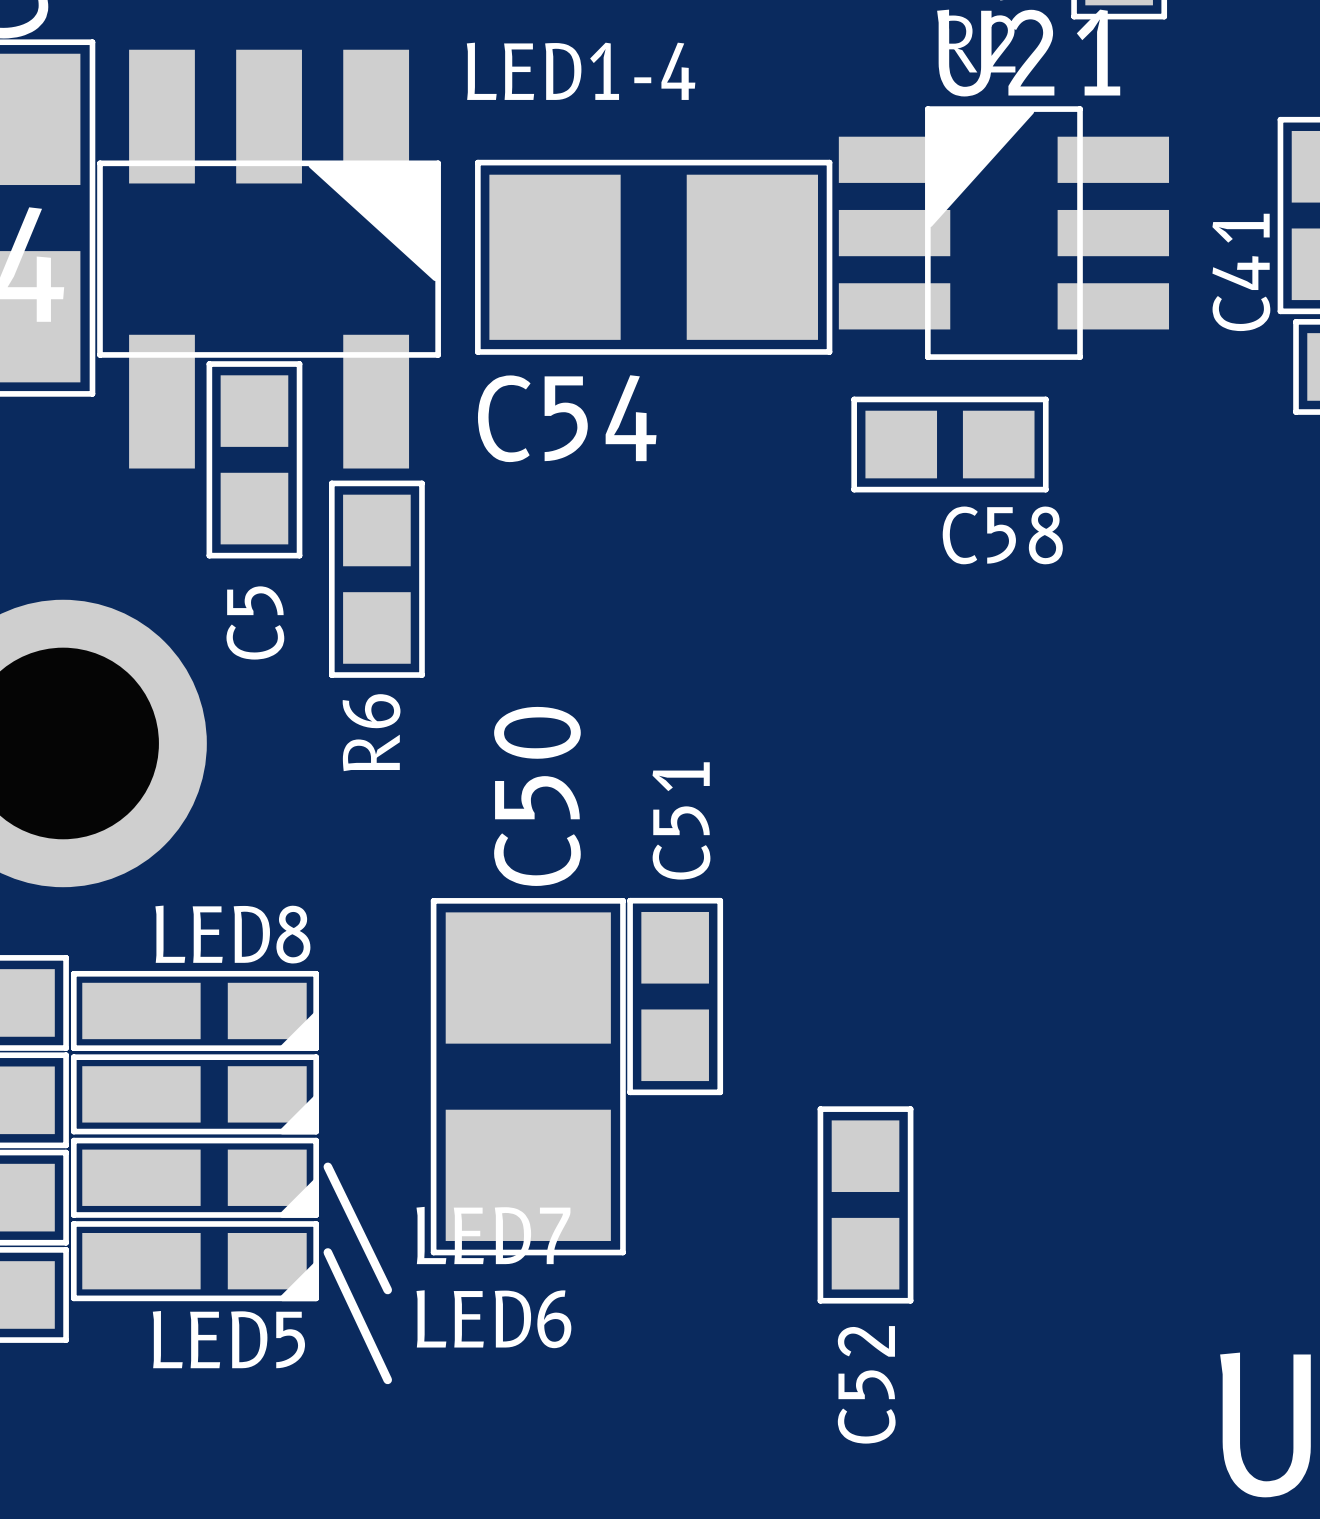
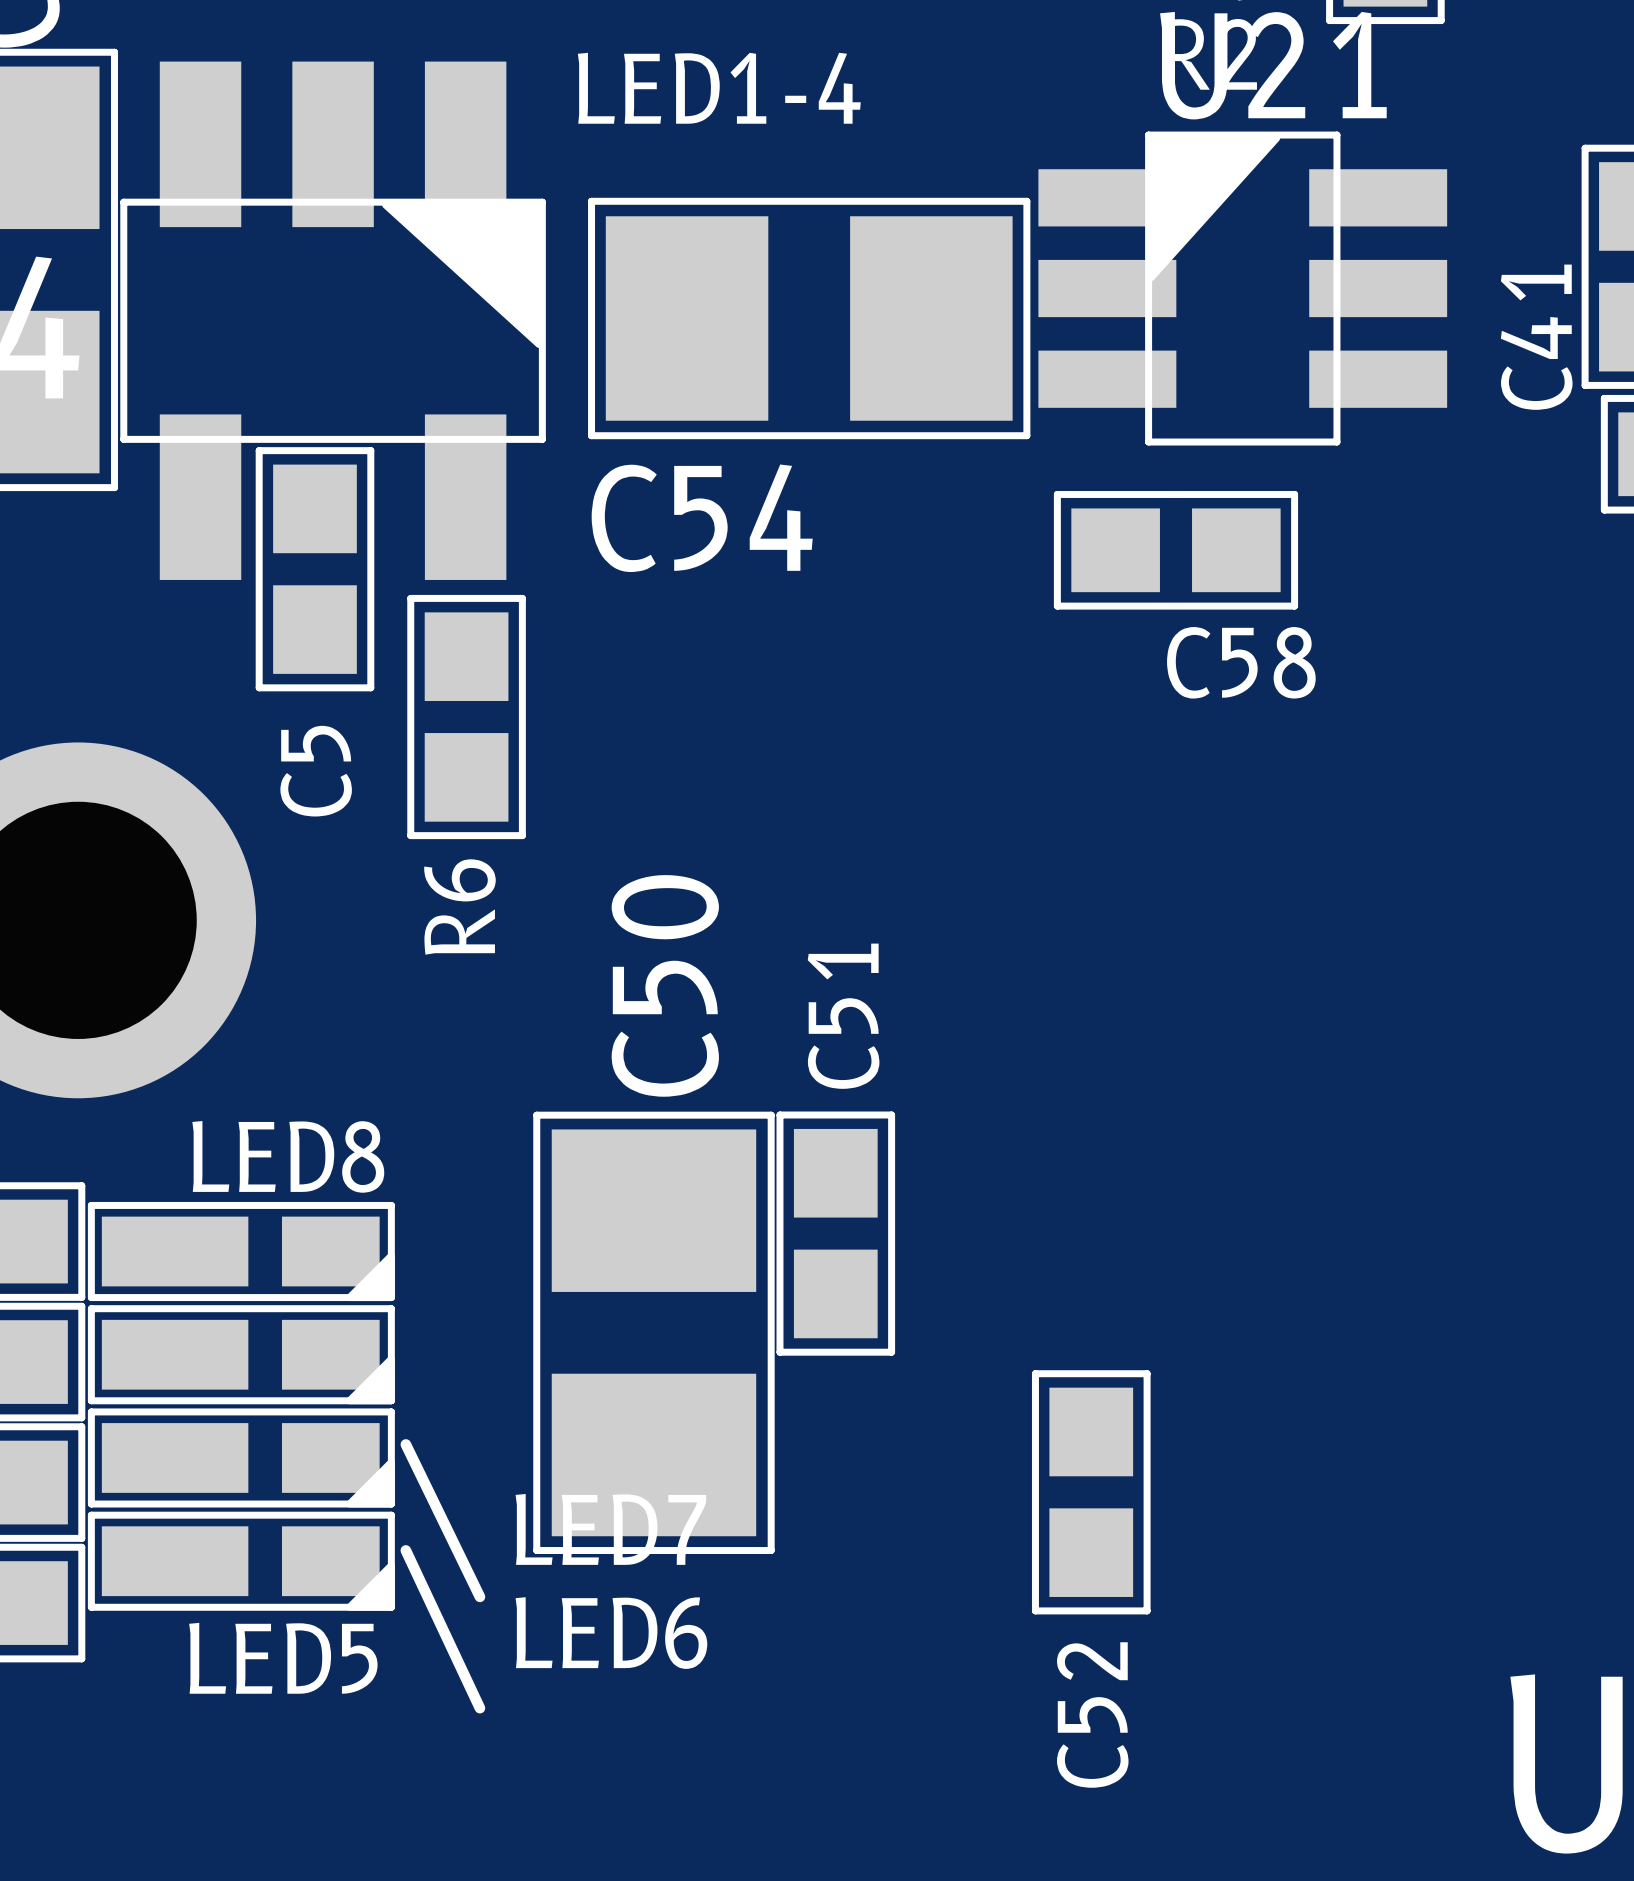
C52 position: (865, 1204) -> (1091, 1492)

